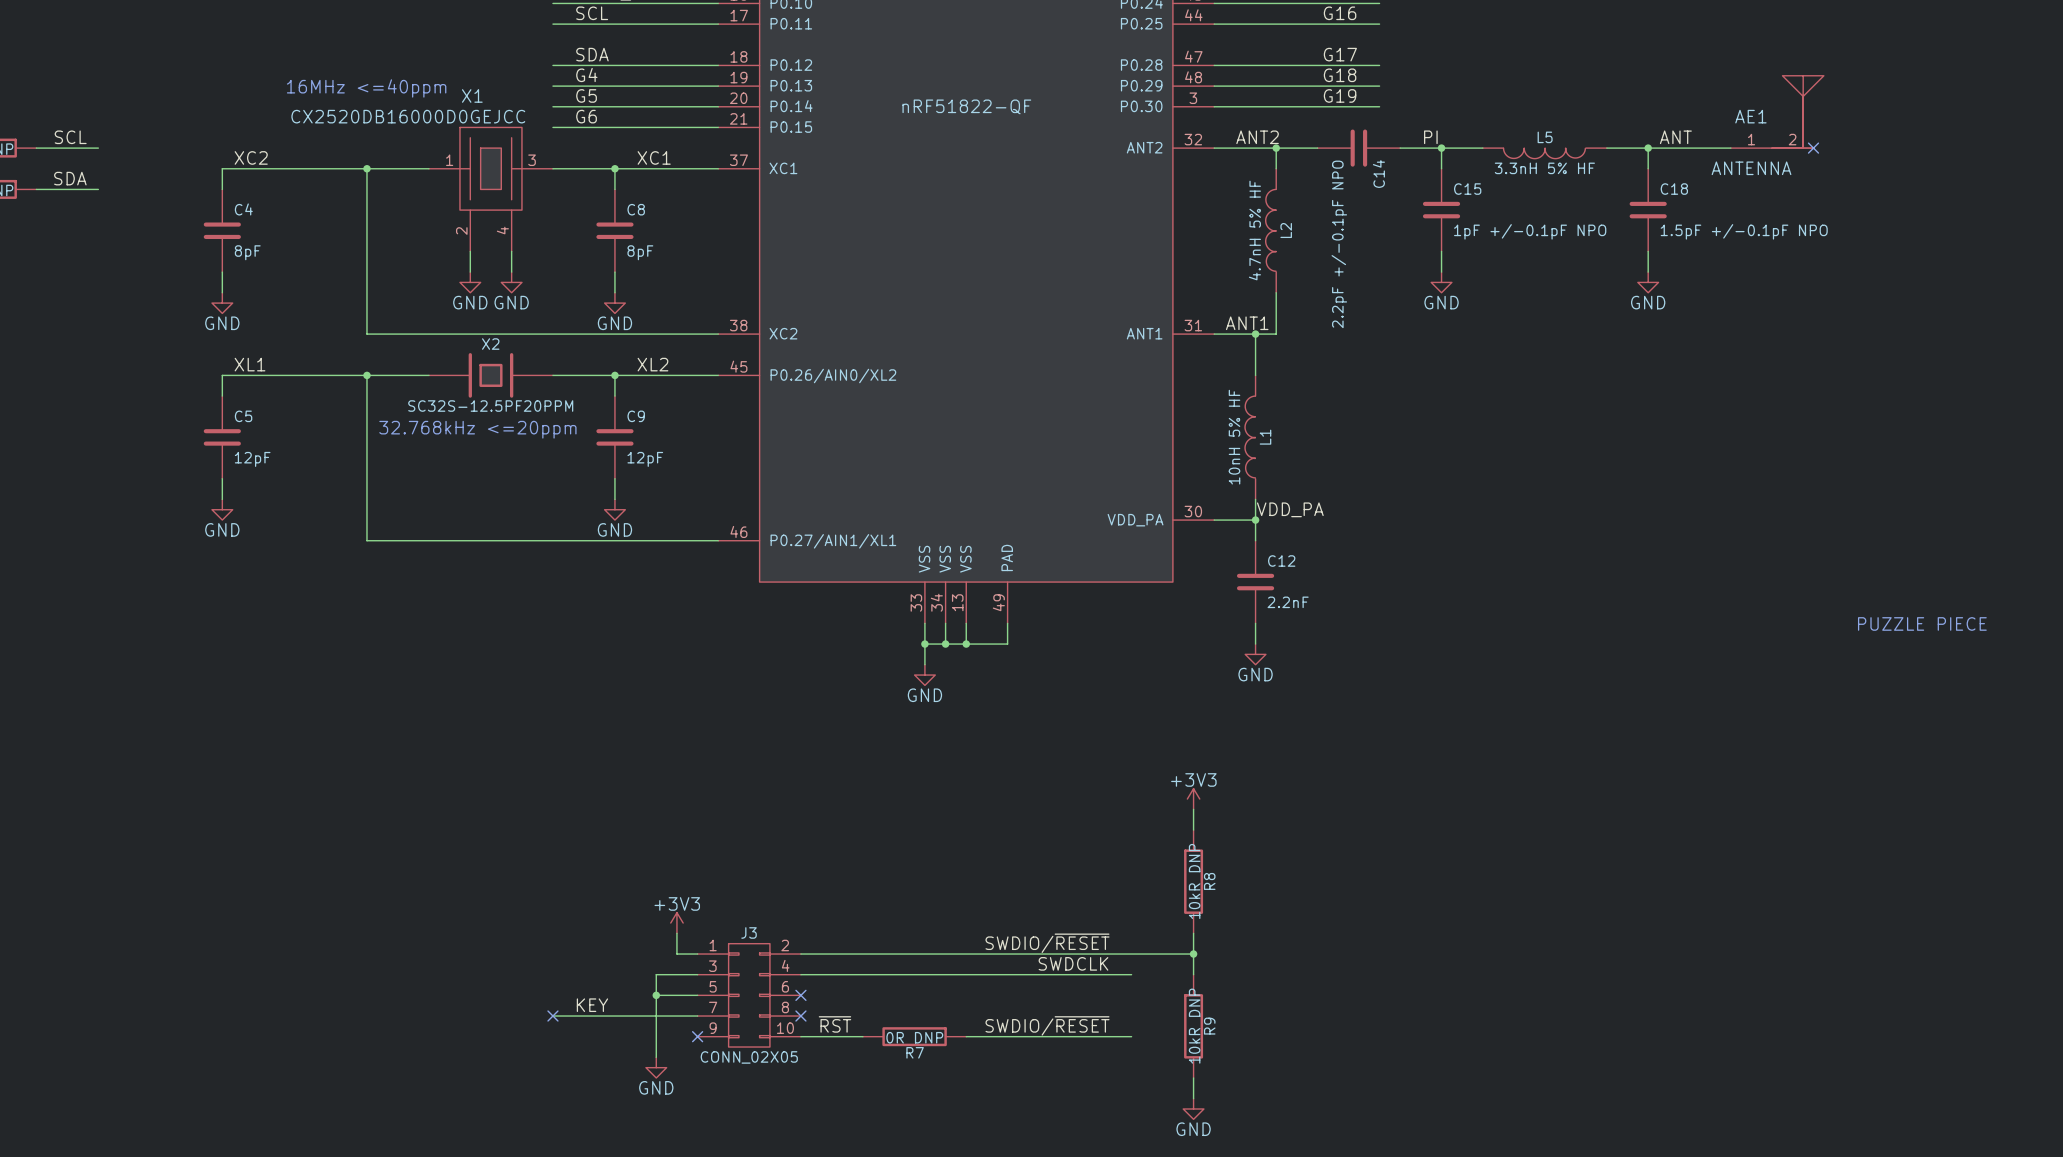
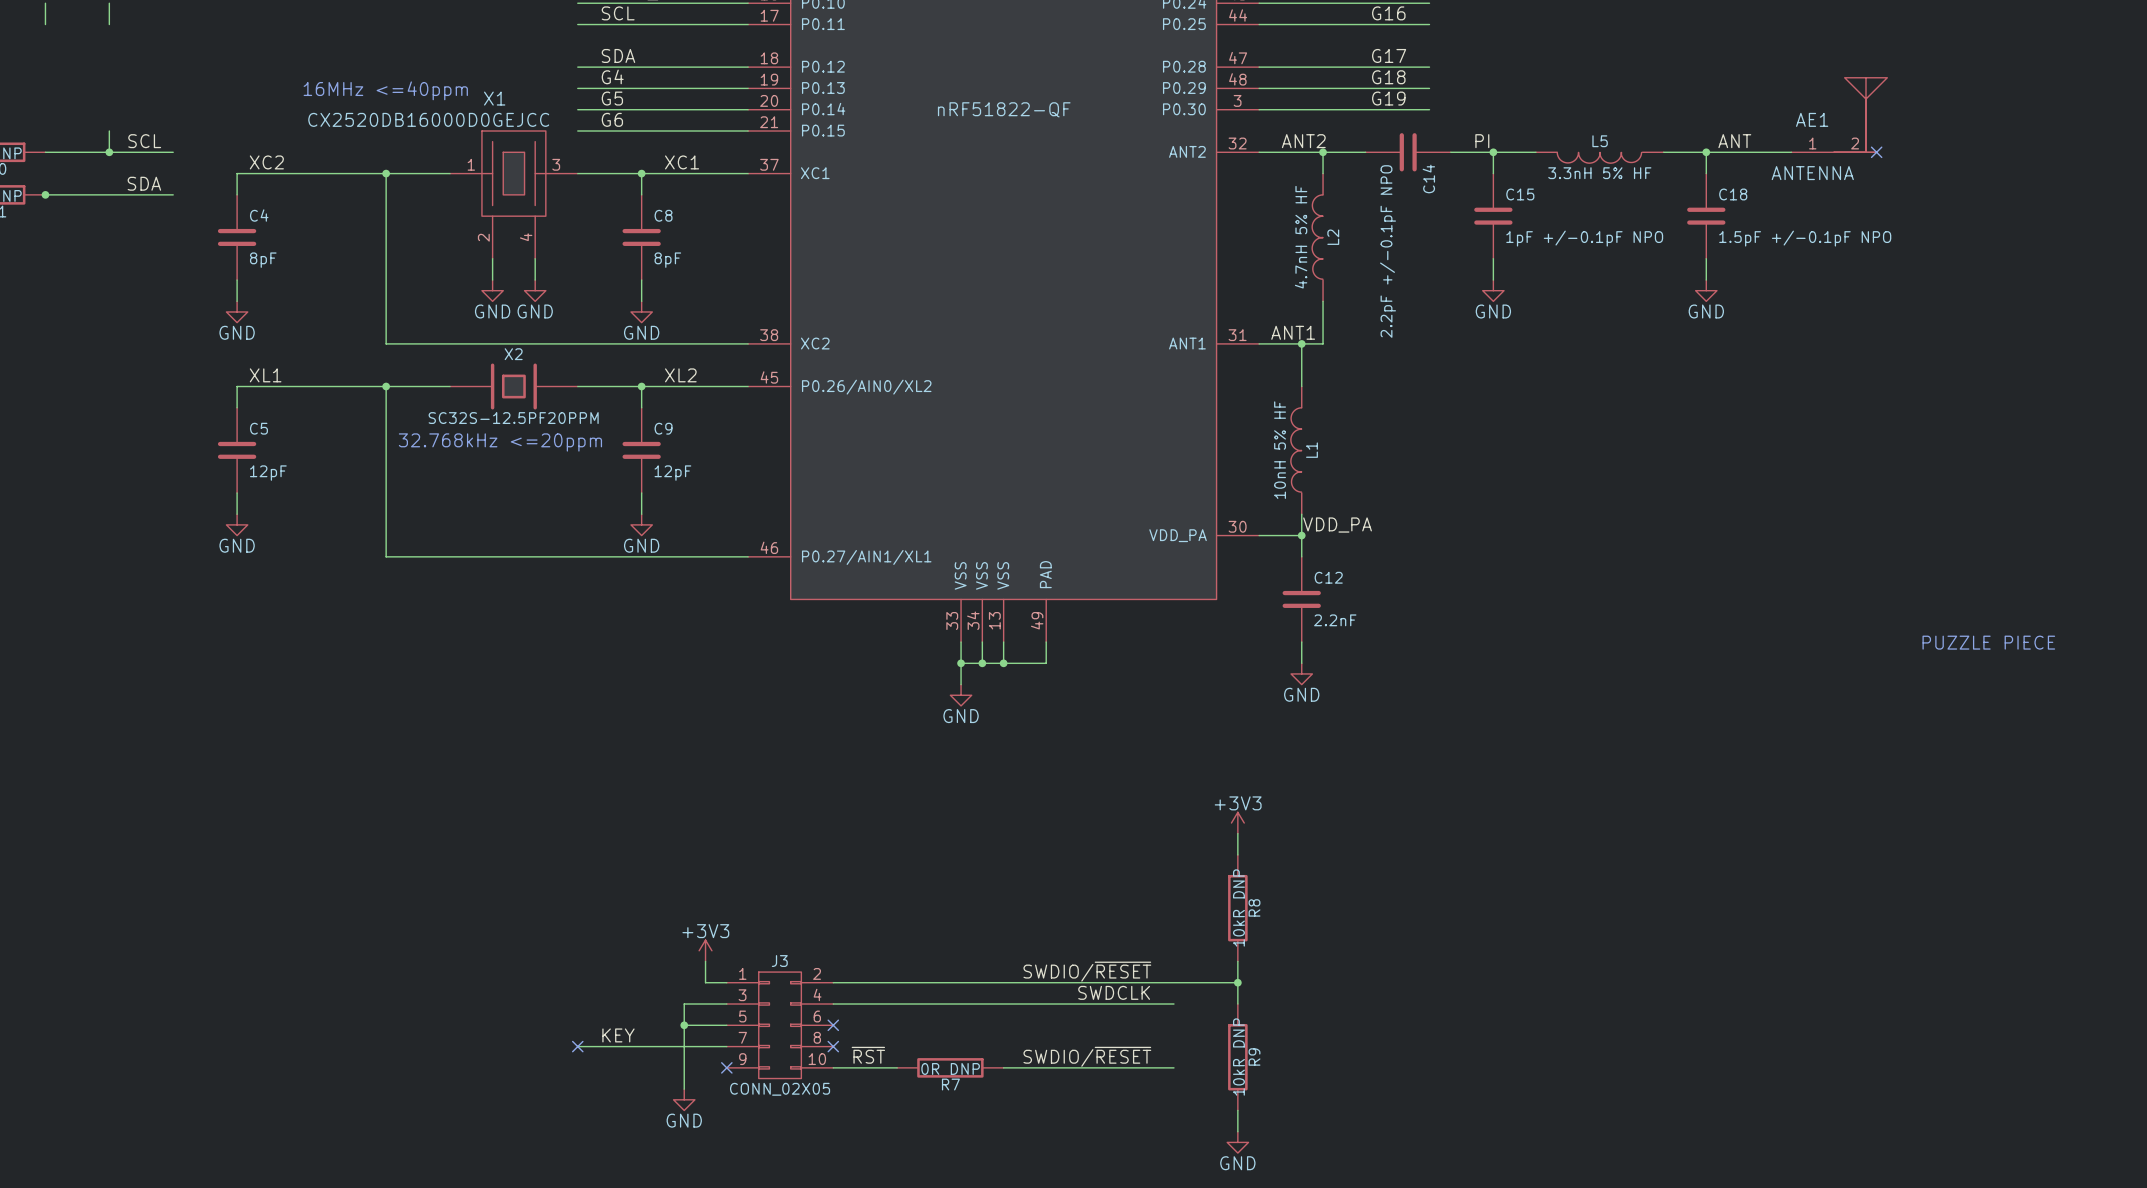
wire: none -> (45, 3) (45, 24)
wire: none -> (109, 3) (109, 24)
wire: none -> (109, 130) (109, 152) (173, 152)
label position: SCL (70, 137) -> SCL (144, 141)
junction: none -> (109, 152)
label position: SDA (70, 178) -> SDA (144, 183)
junction: none -> (45, 194)
wire: none -> (109, 194) (173, 194)

